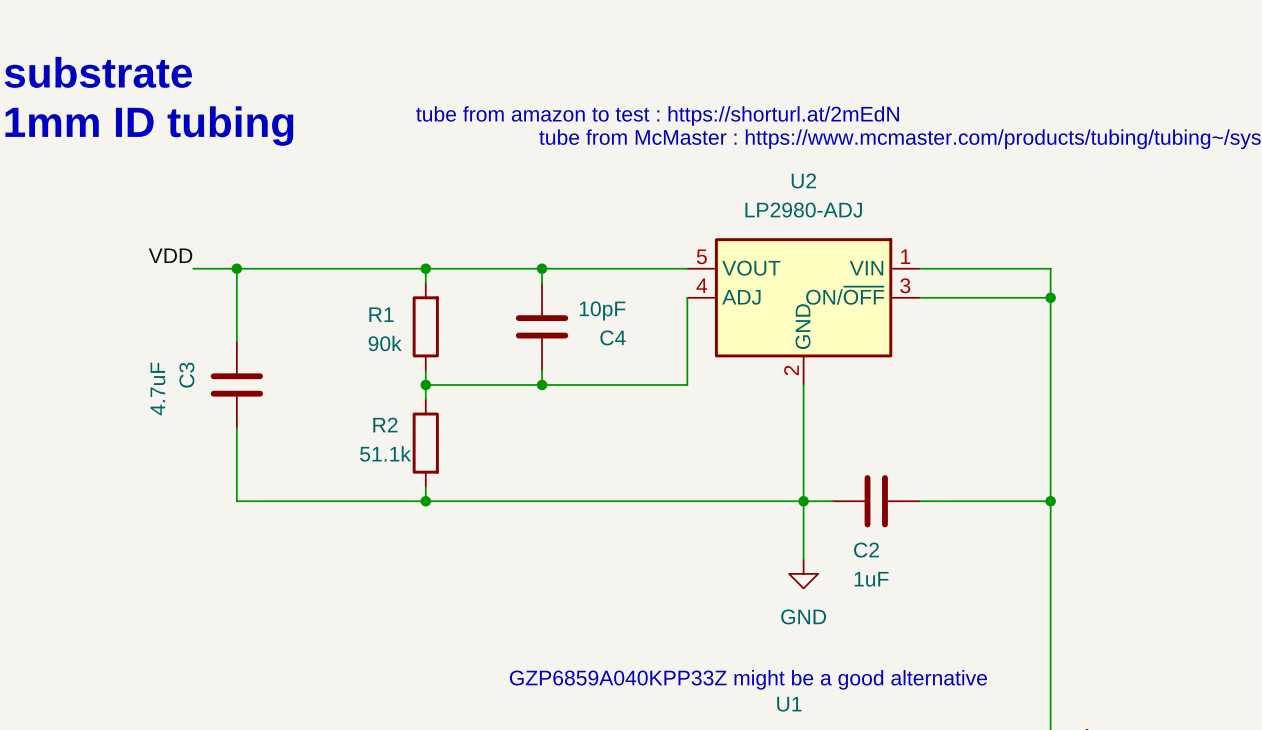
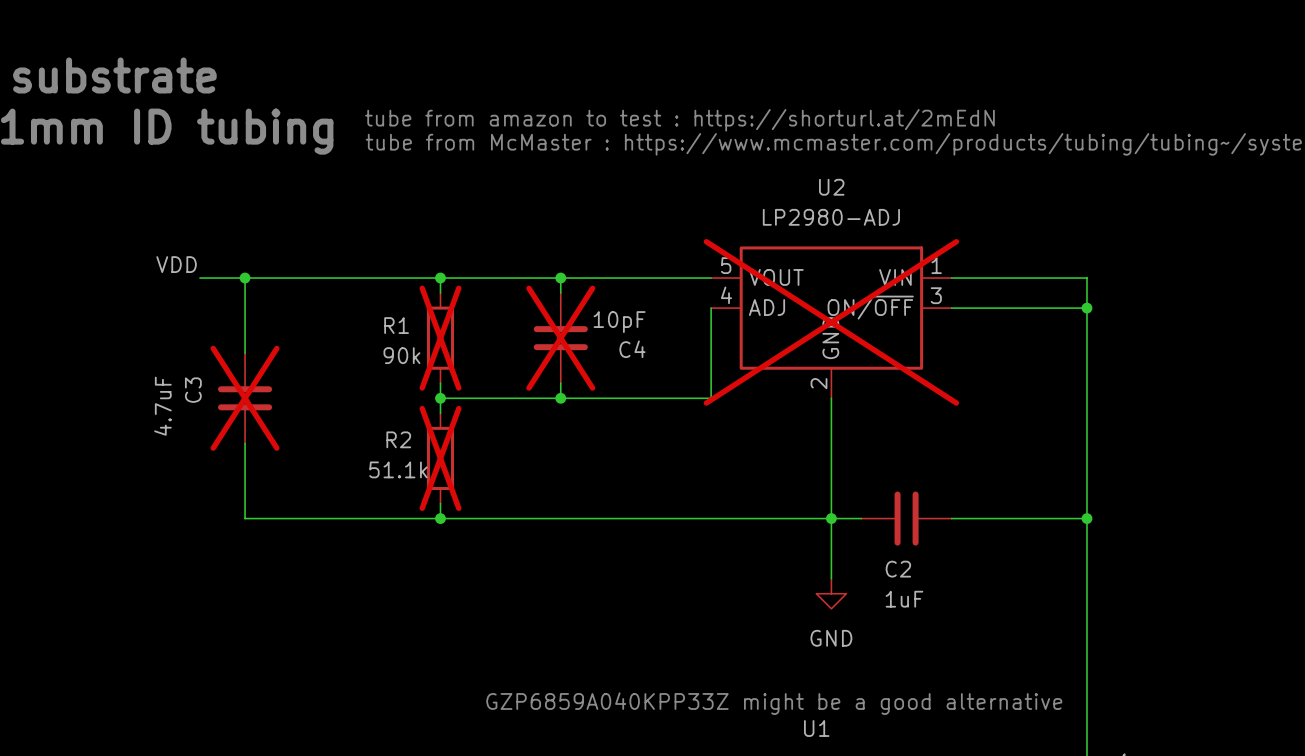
U2 do-not-place cross: none -> (831, 322)
R1 do-not-place cross: none -> (440, 338)
C4 do-not-place cross: none -> (560, 338)
C3 do-not-place cross: none -> (245, 398)
R2 do-not-place cross: none -> (440, 458)

